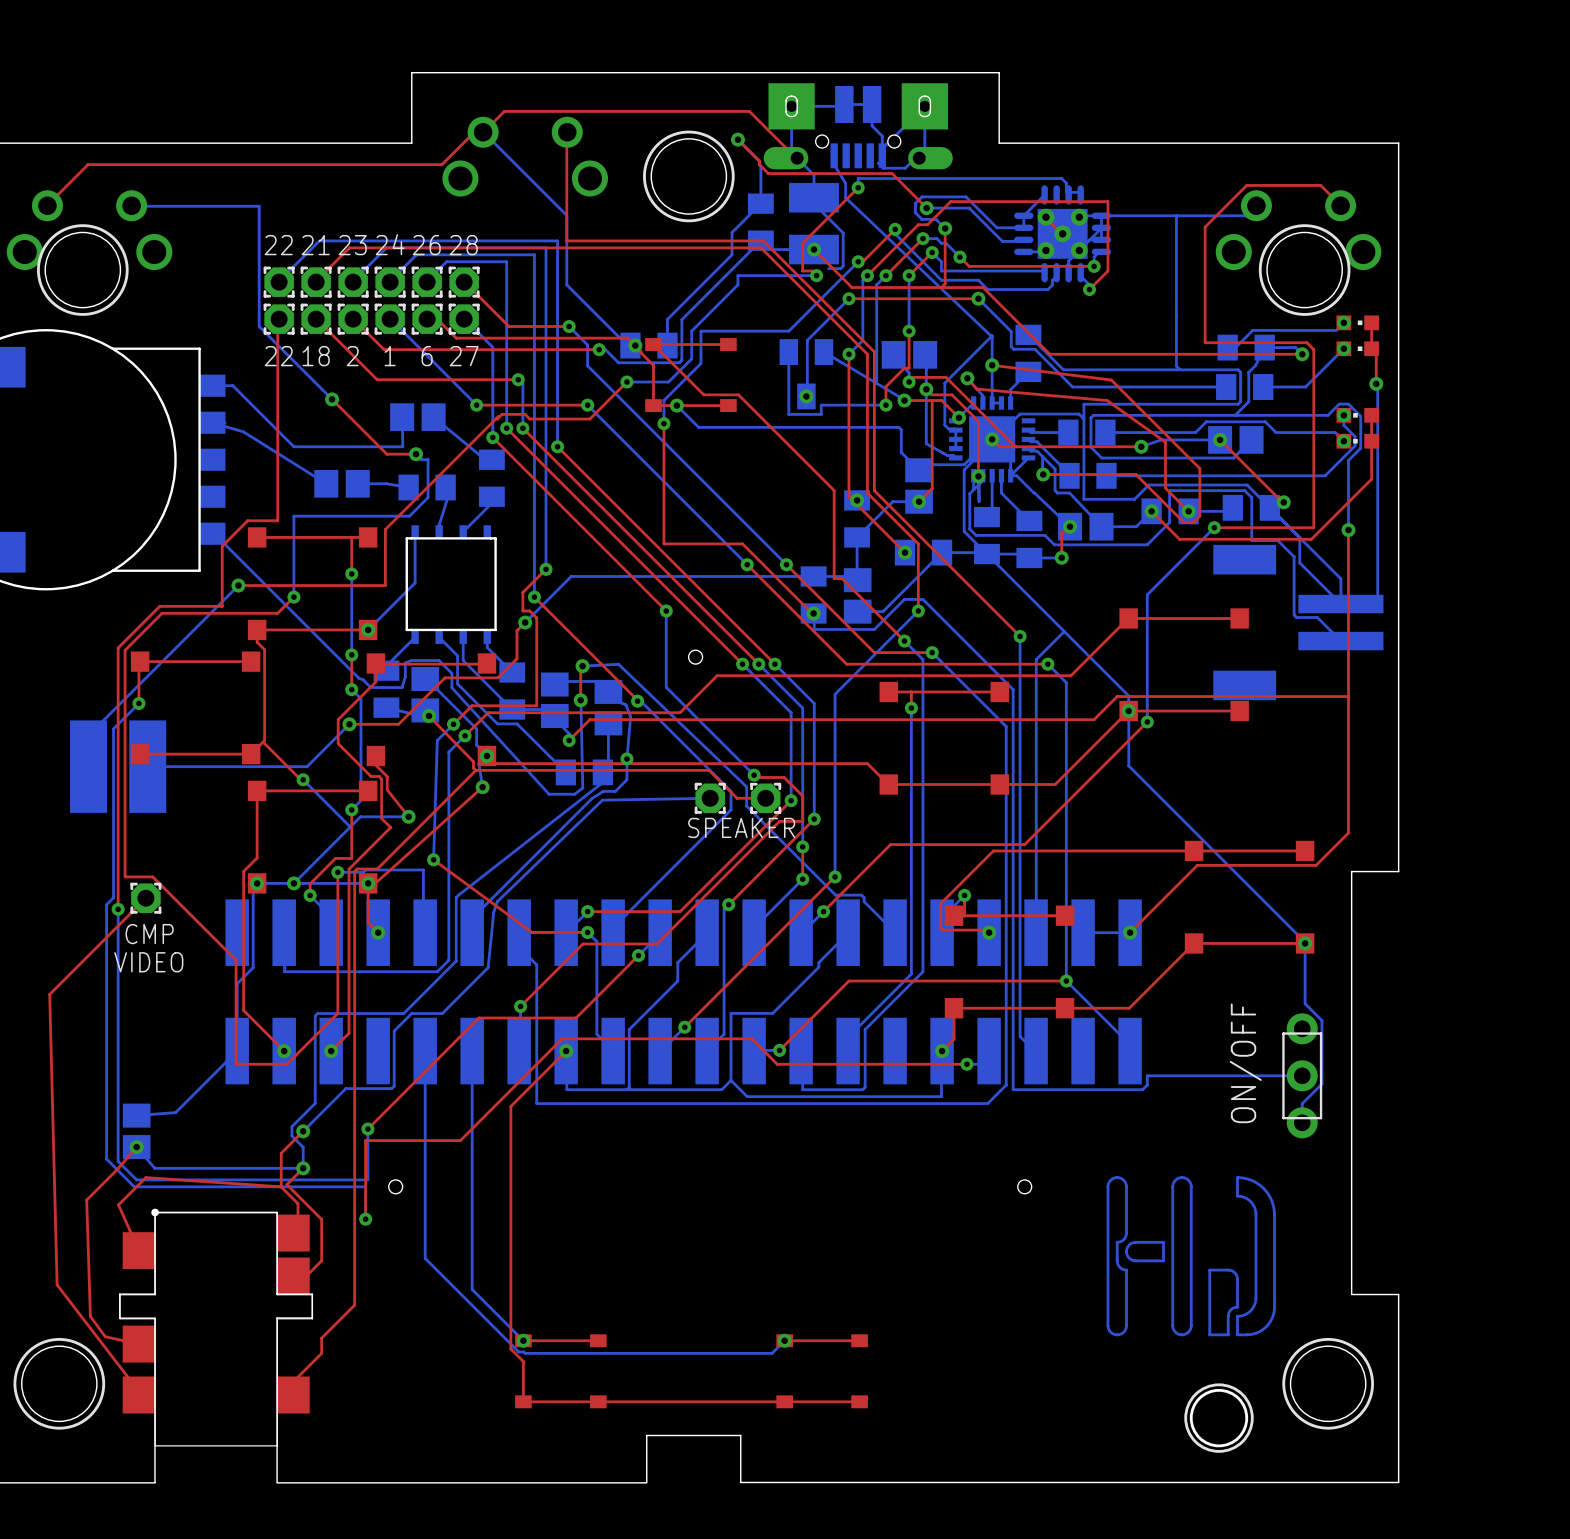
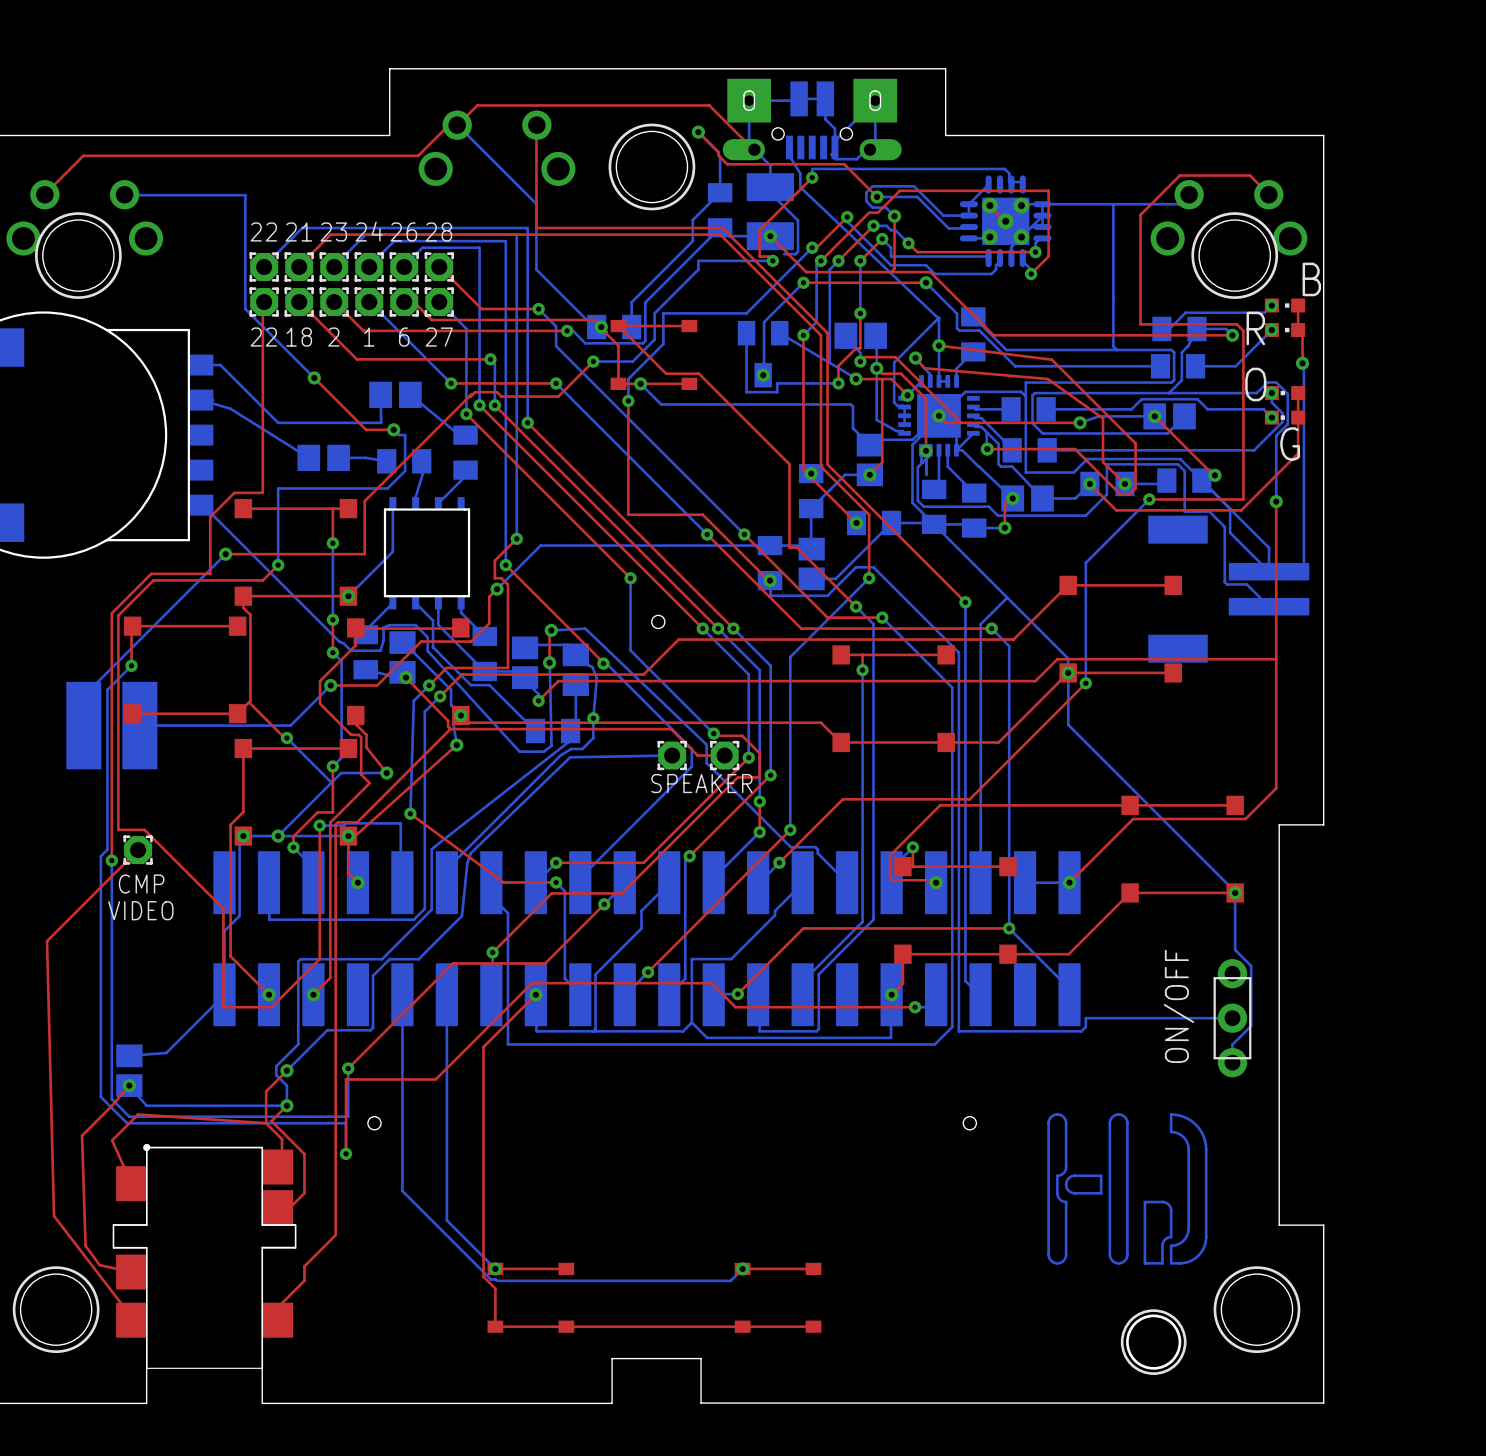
text: none -> B (1311, 279)
text: none -> R (1255, 328)
text: none -> O (1255, 384)
text: none -> G (1290, 444)

